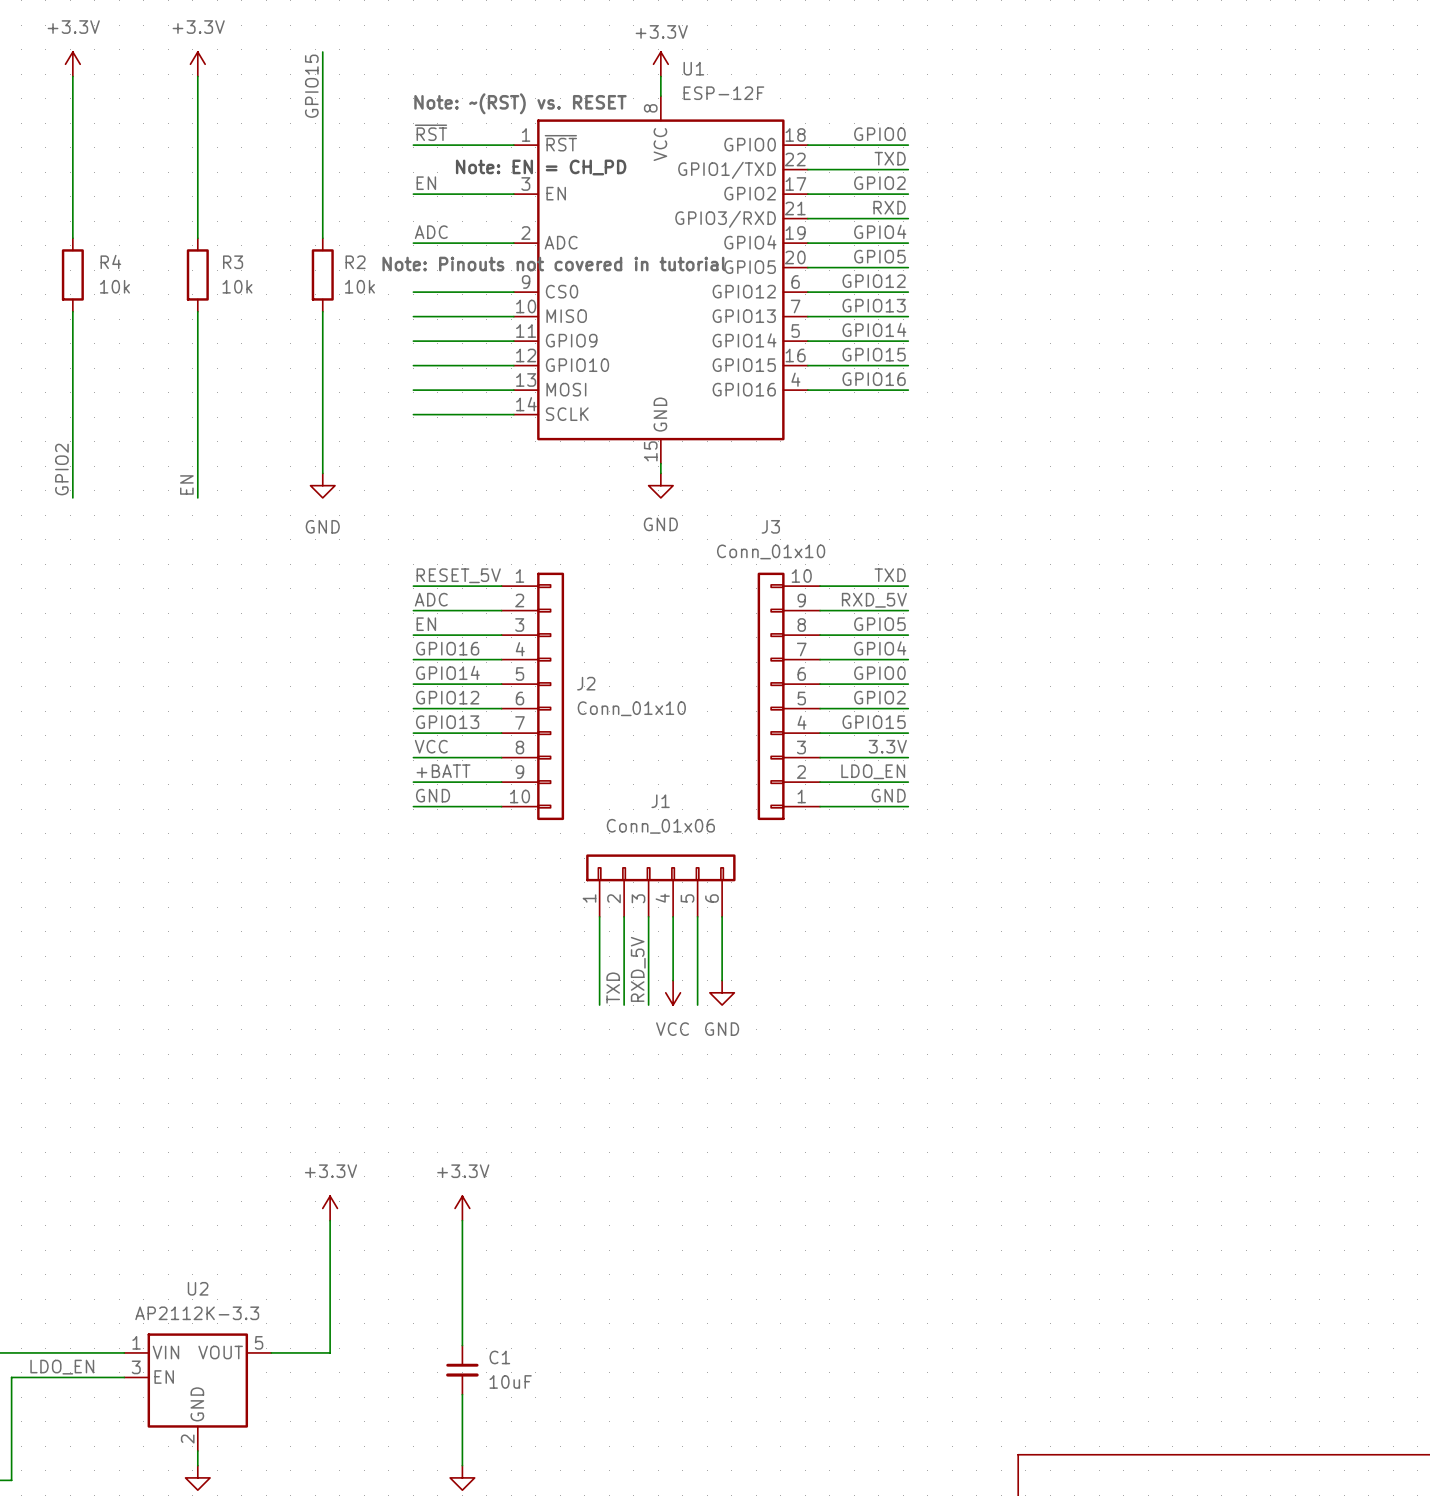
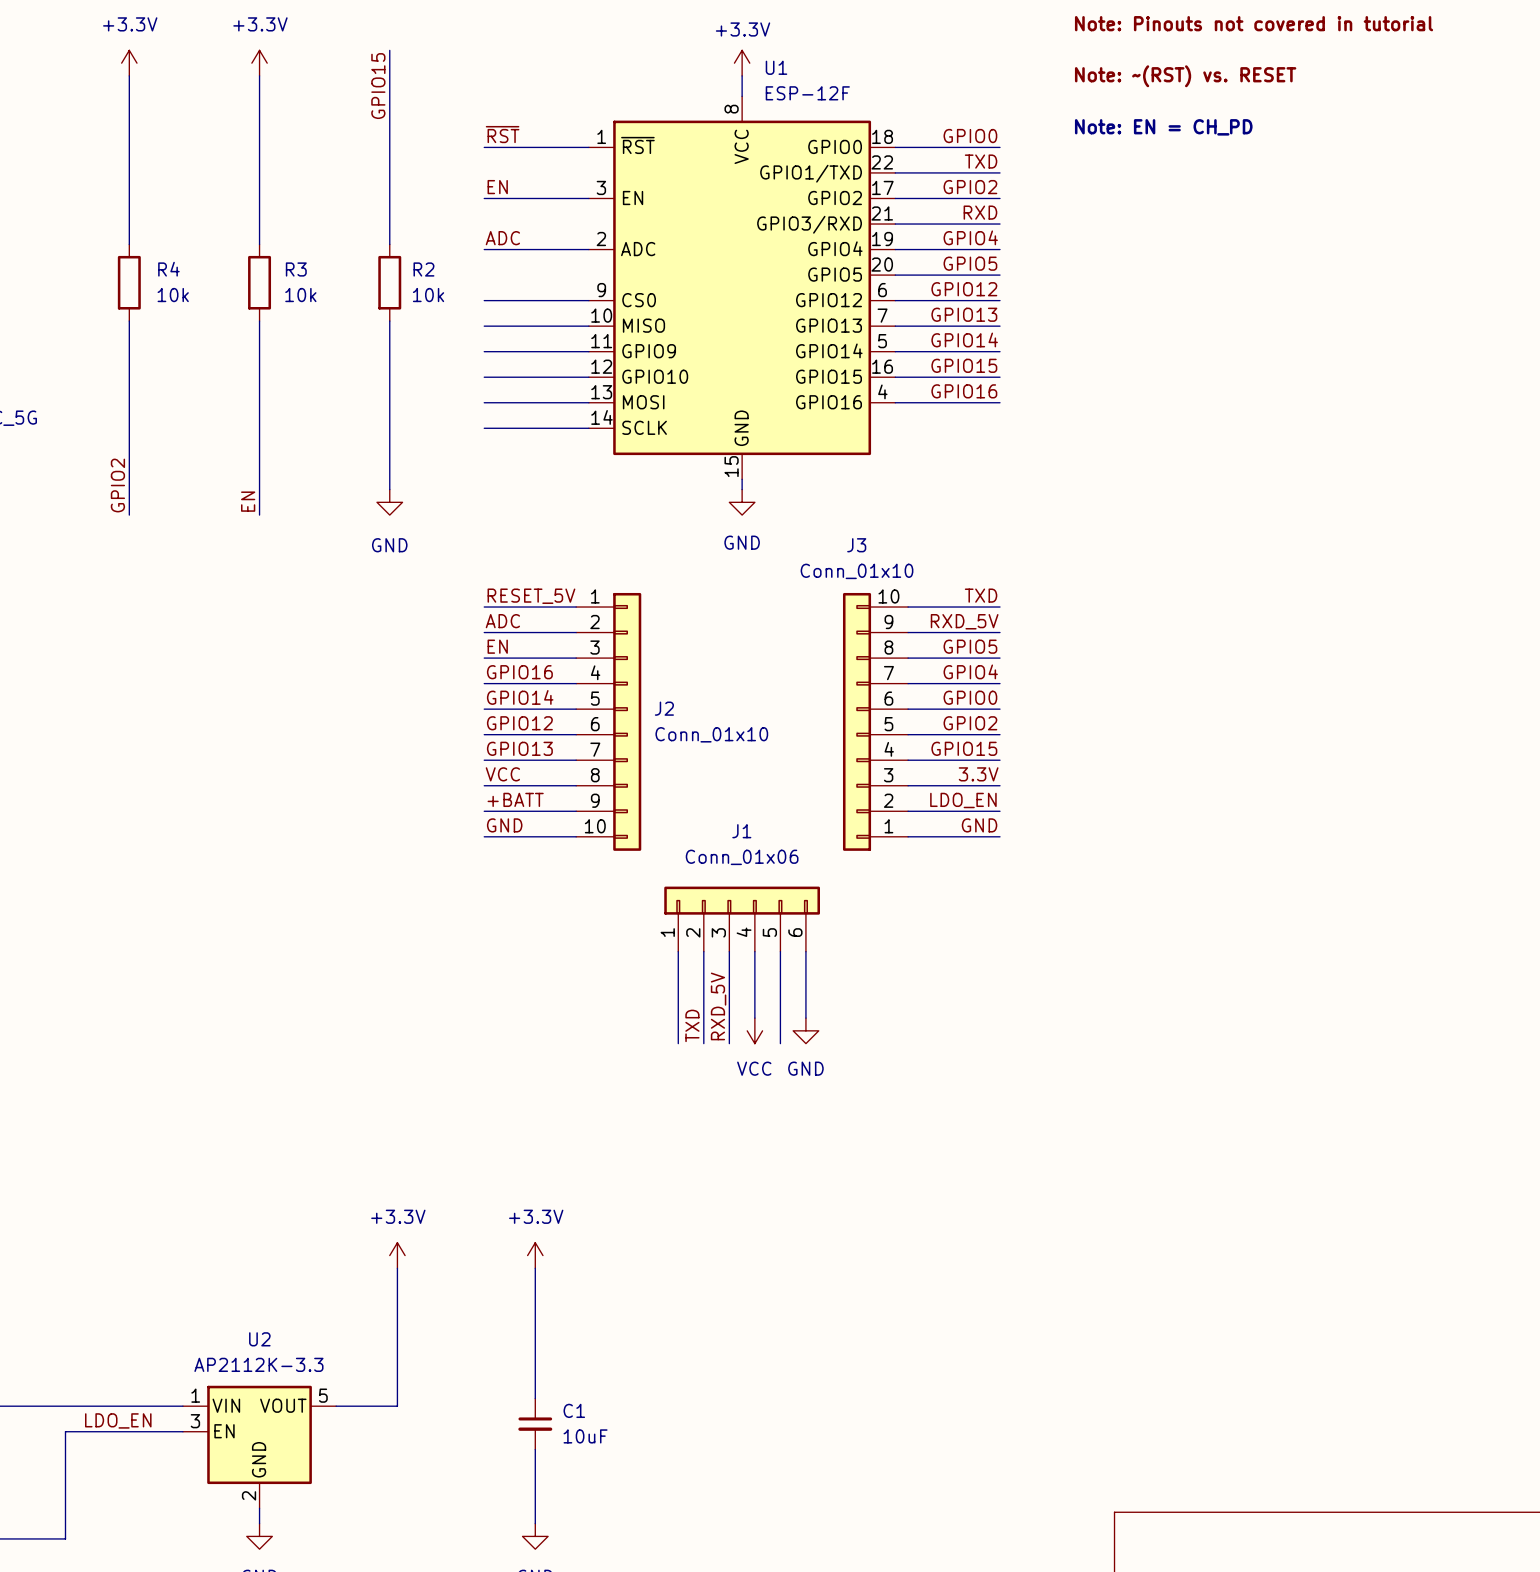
label: none -> Note: Pinouts not covered in tutorial (1254, 23)
label: none -> Note: ~(RST) vs. RESET (1185, 76)
label: Note: ~(RST) vs. RESET (520, 103) -> none
text: none -> Note: EN = CH_PD (1163, 127)
text: Note: EN = CH_PD (541, 167) -> none
label: Note: Pinouts not covered in tutorial (554, 264) -> none

